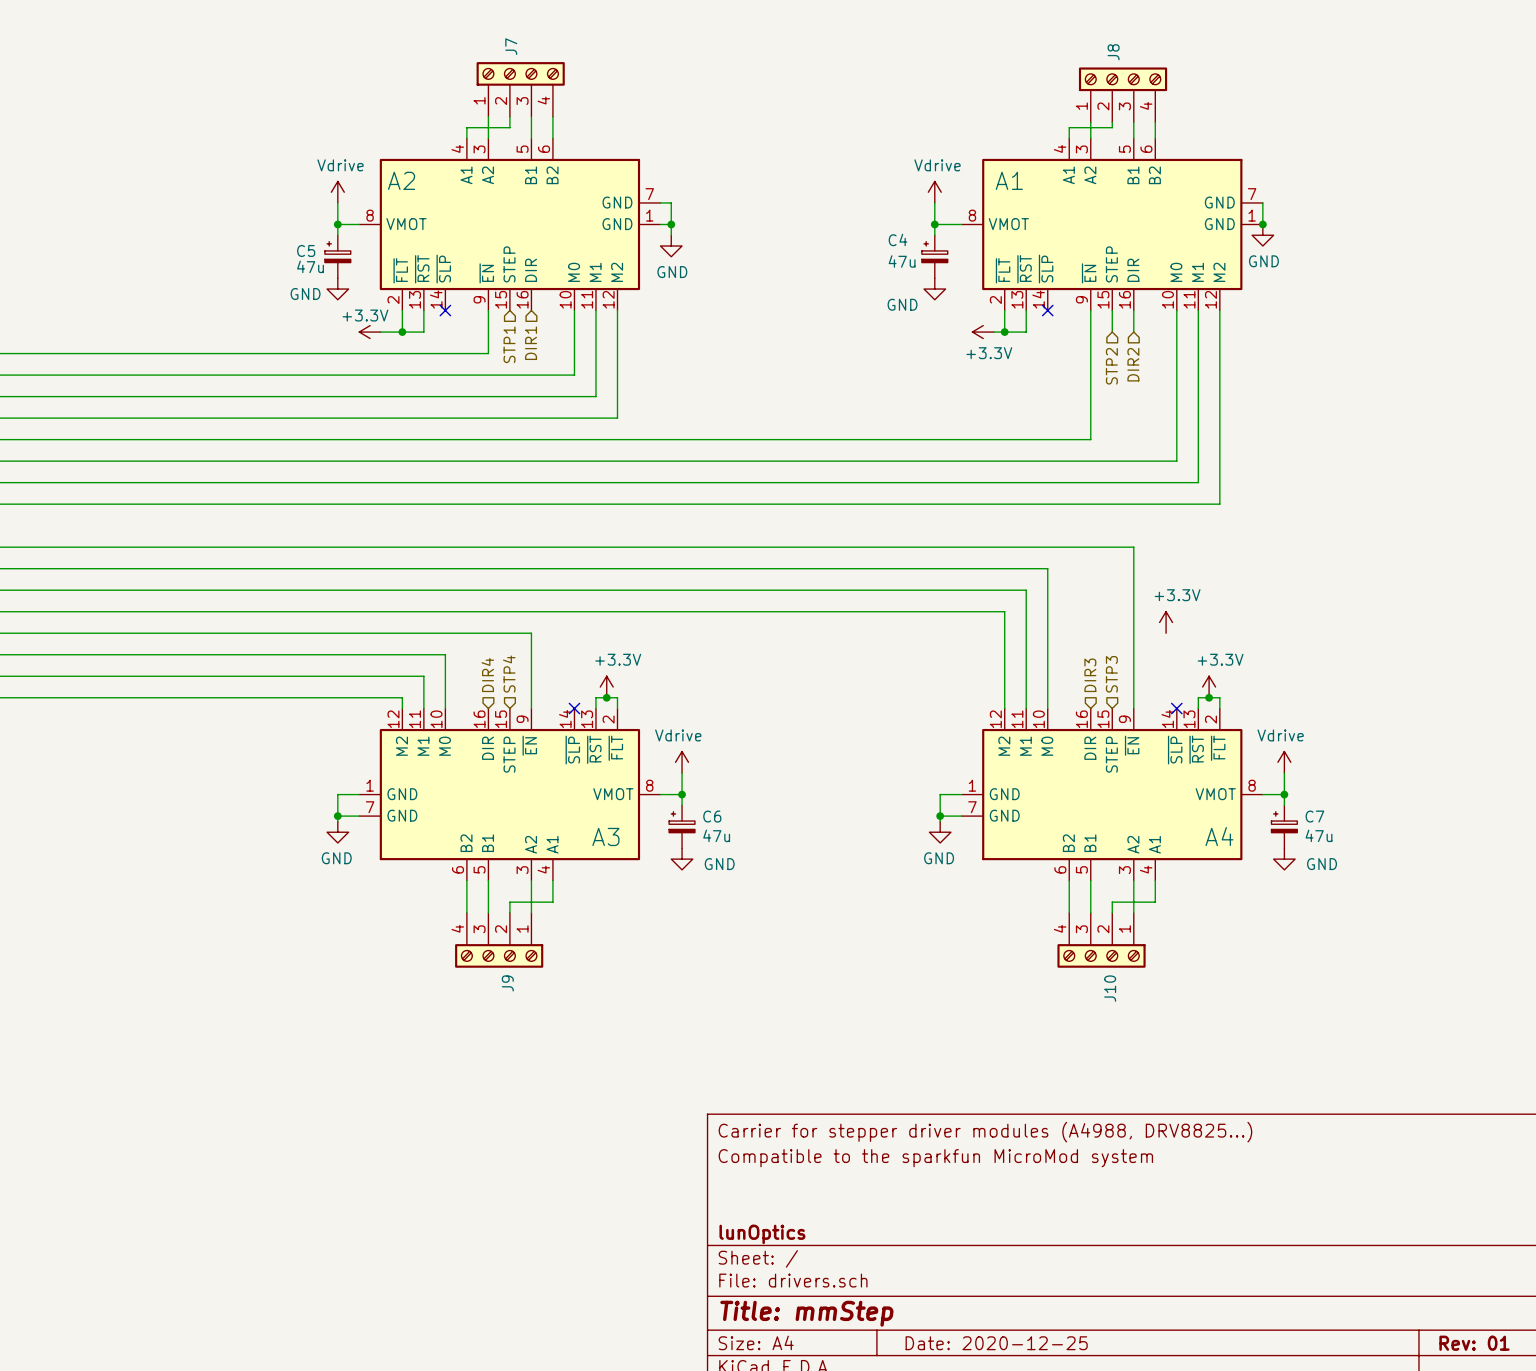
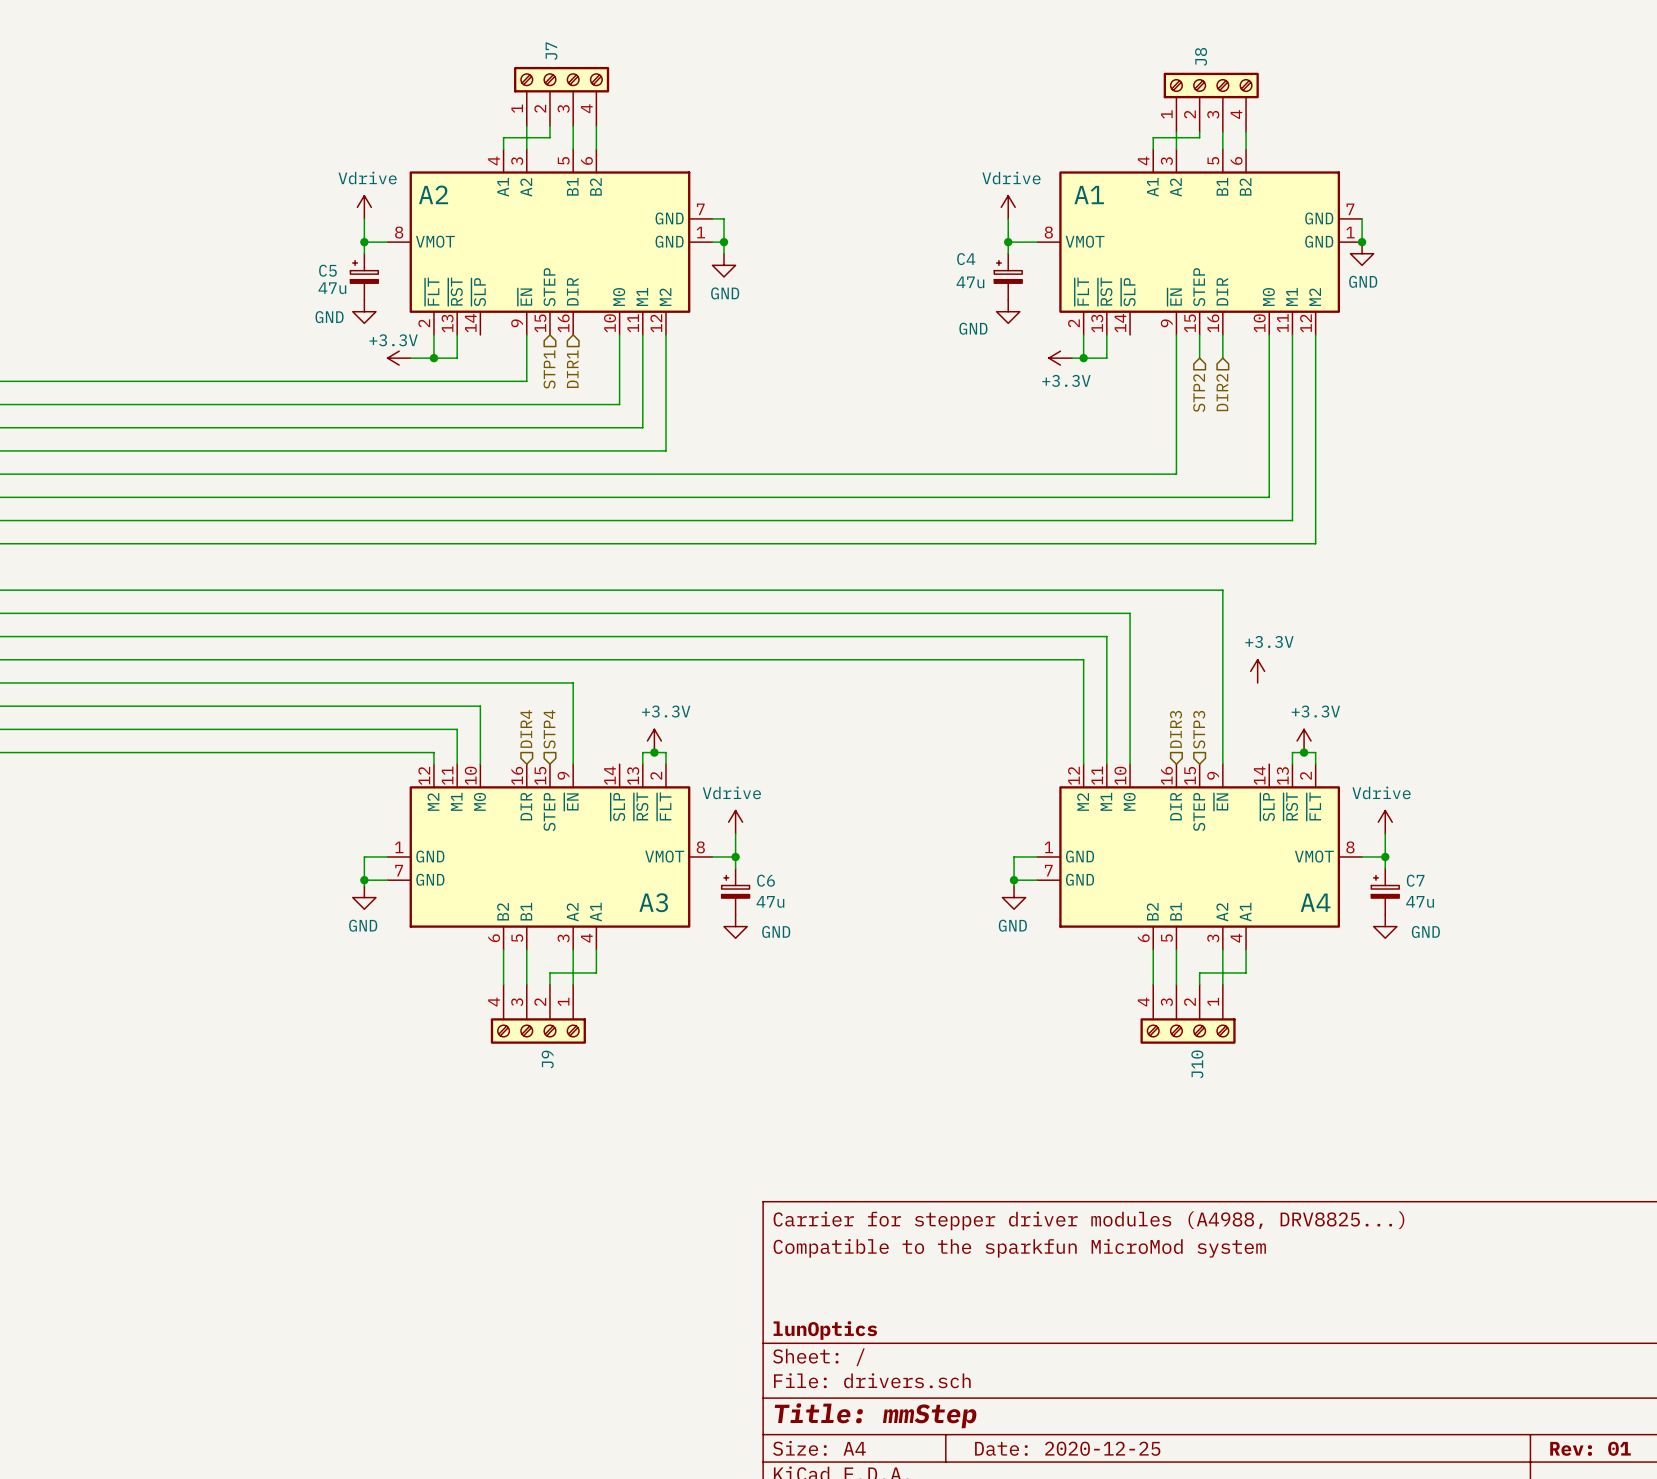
no-connect mark: (445, 310) -> none
no-connect mark: (1047, 310) -> none
no-connect mark: (574, 708) -> none
no-connect mark: (1176, 708) -> none

